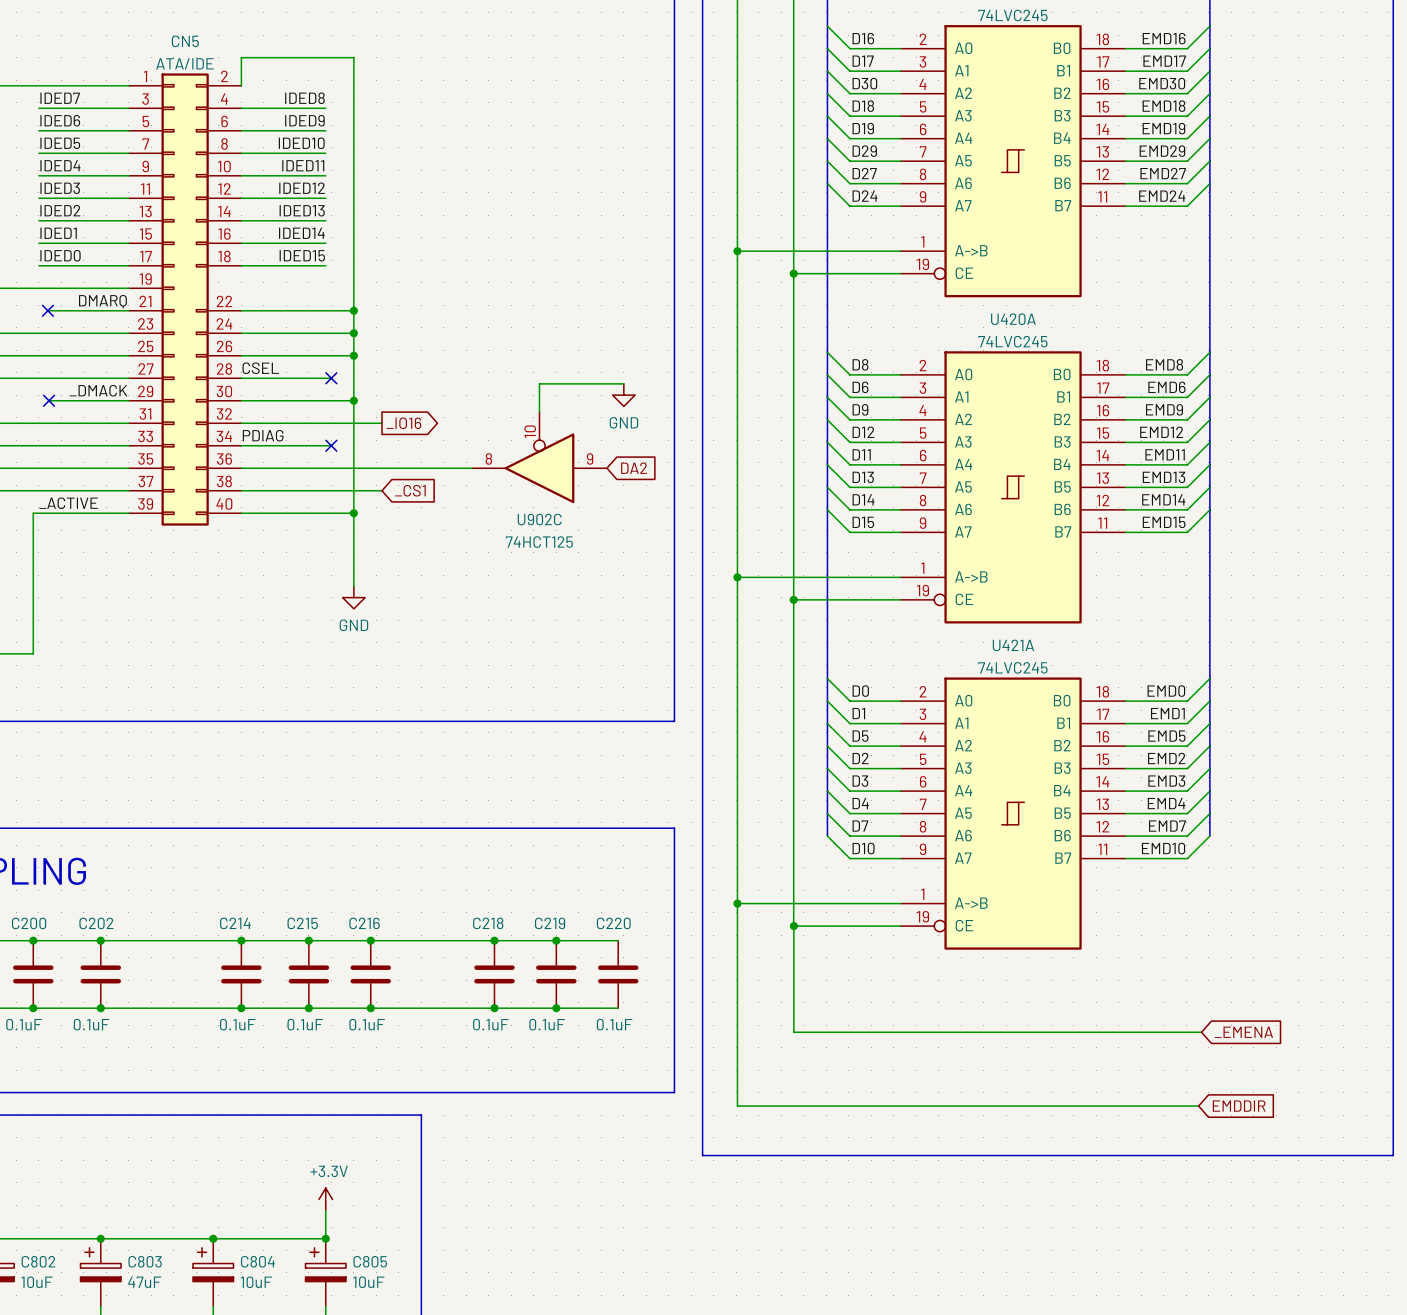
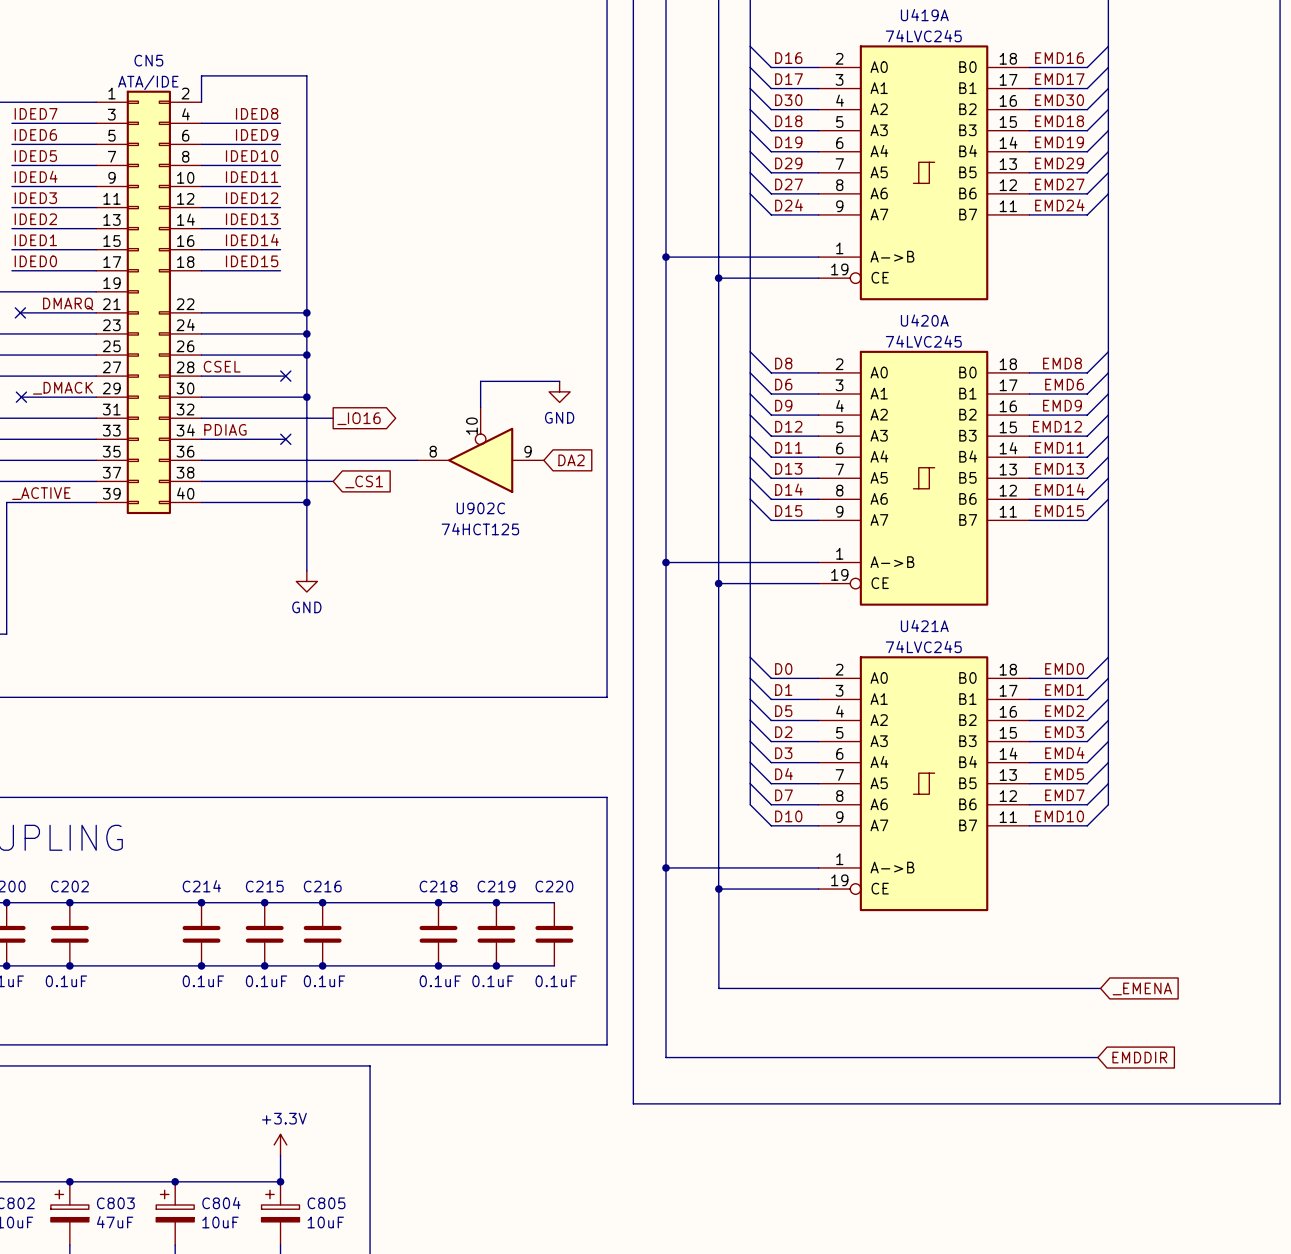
label: EMD5 (1166, 736) -> EMD2 (1064, 711)
label: EMD2 (1166, 758) -> EMD3 (1064, 732)
label: EMD3 (1166, 781) -> EMD4 (1064, 752)
label: EMD4 (1166, 803) -> EMD5 (1064, 774)

